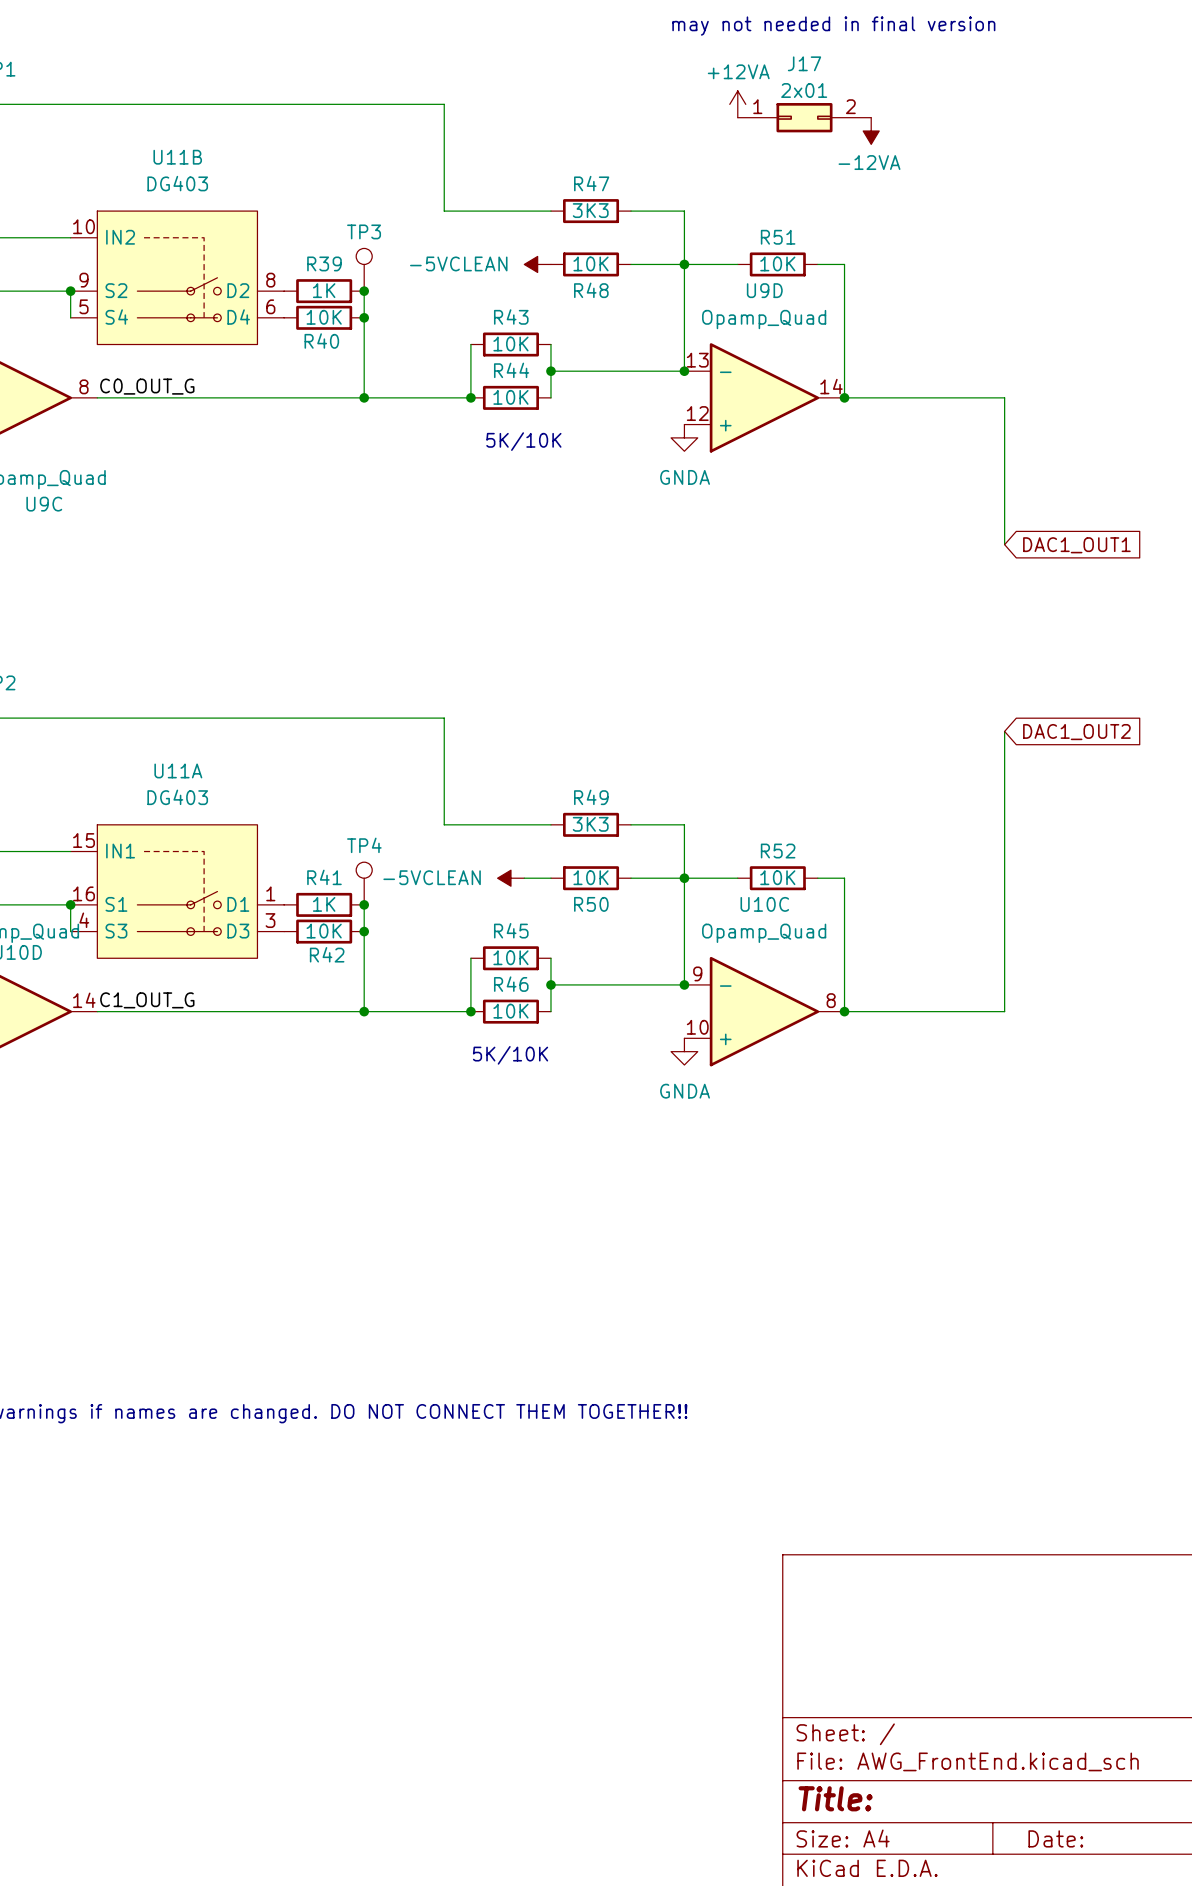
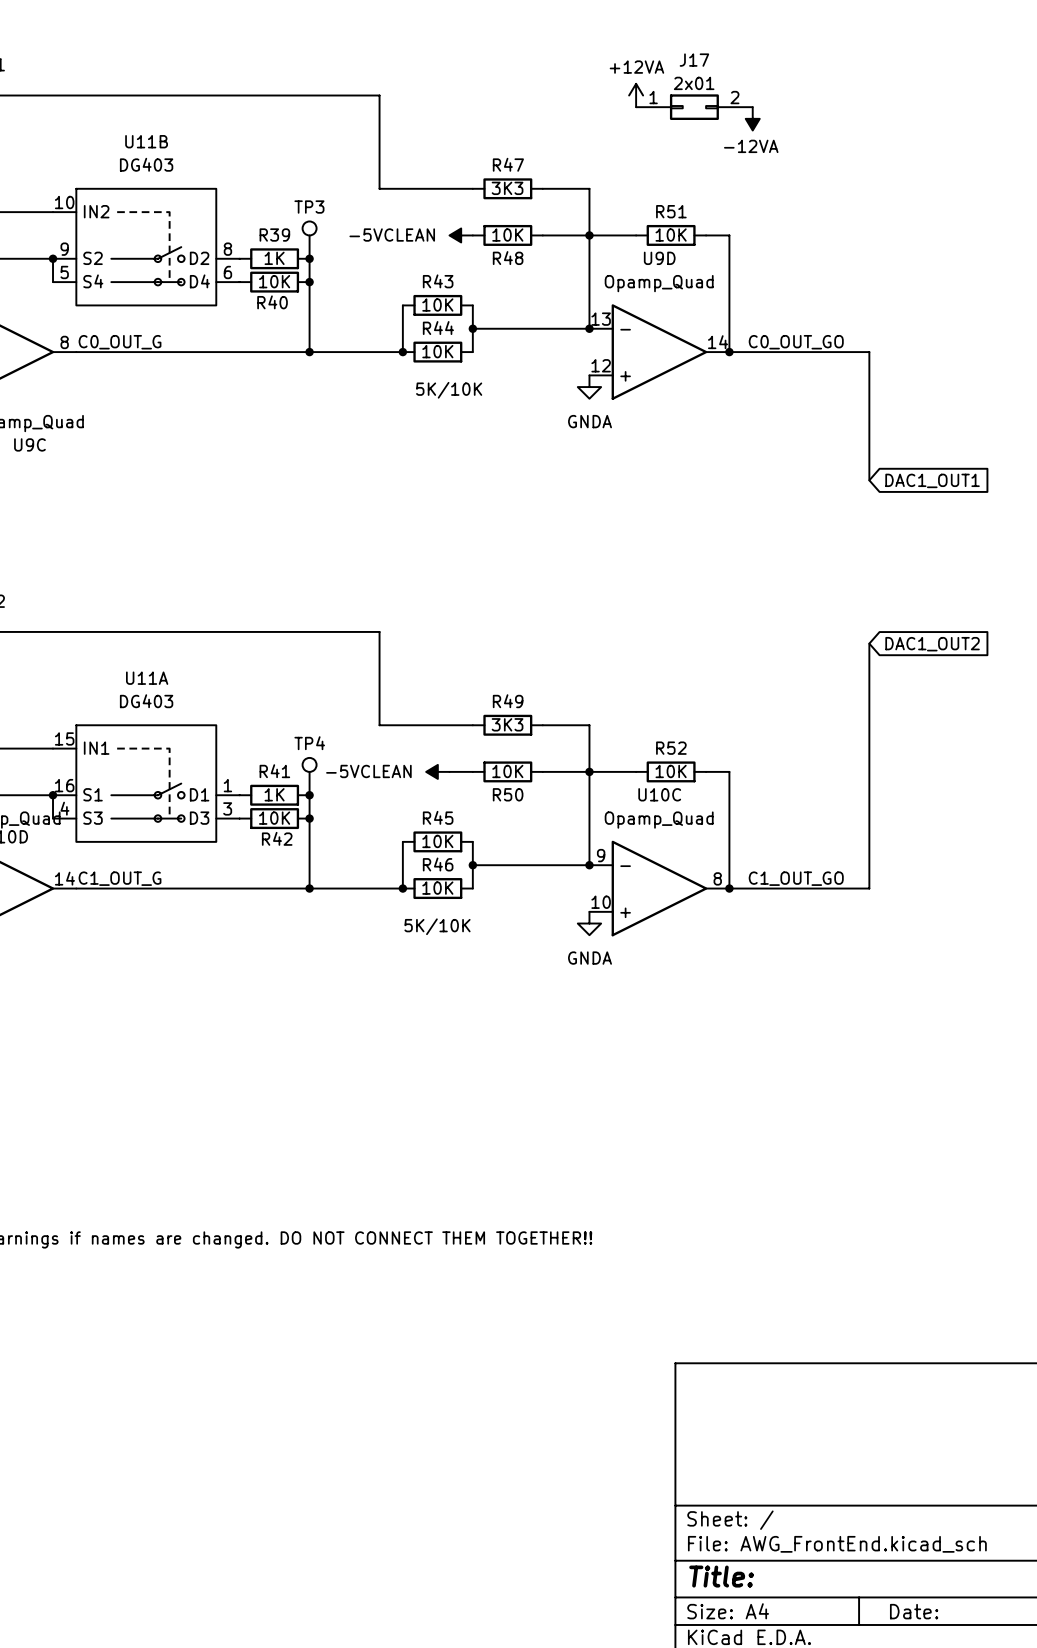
text: may not needed in final version (833, 26) -> none
label: none -> C0_OUT_GO (796, 342)
label: none -> C1_OUT_GO (796, 878)

